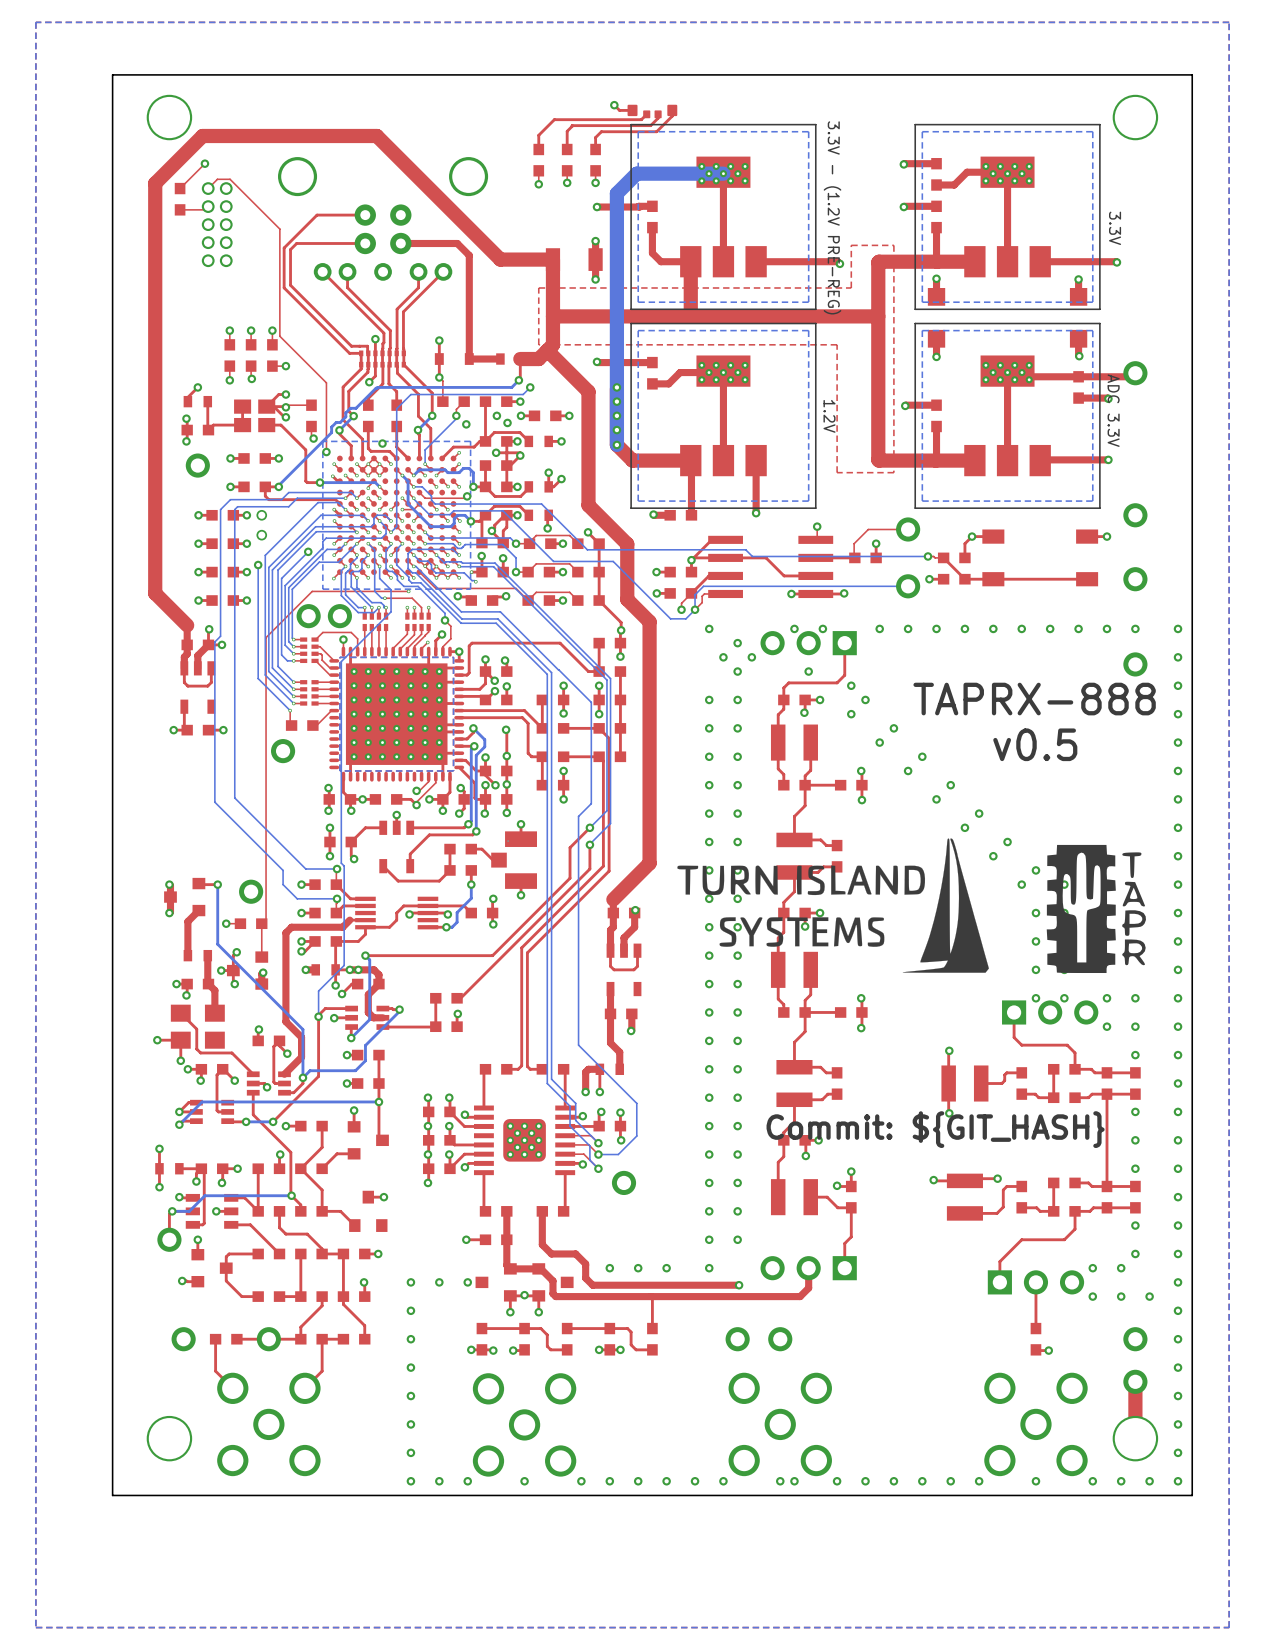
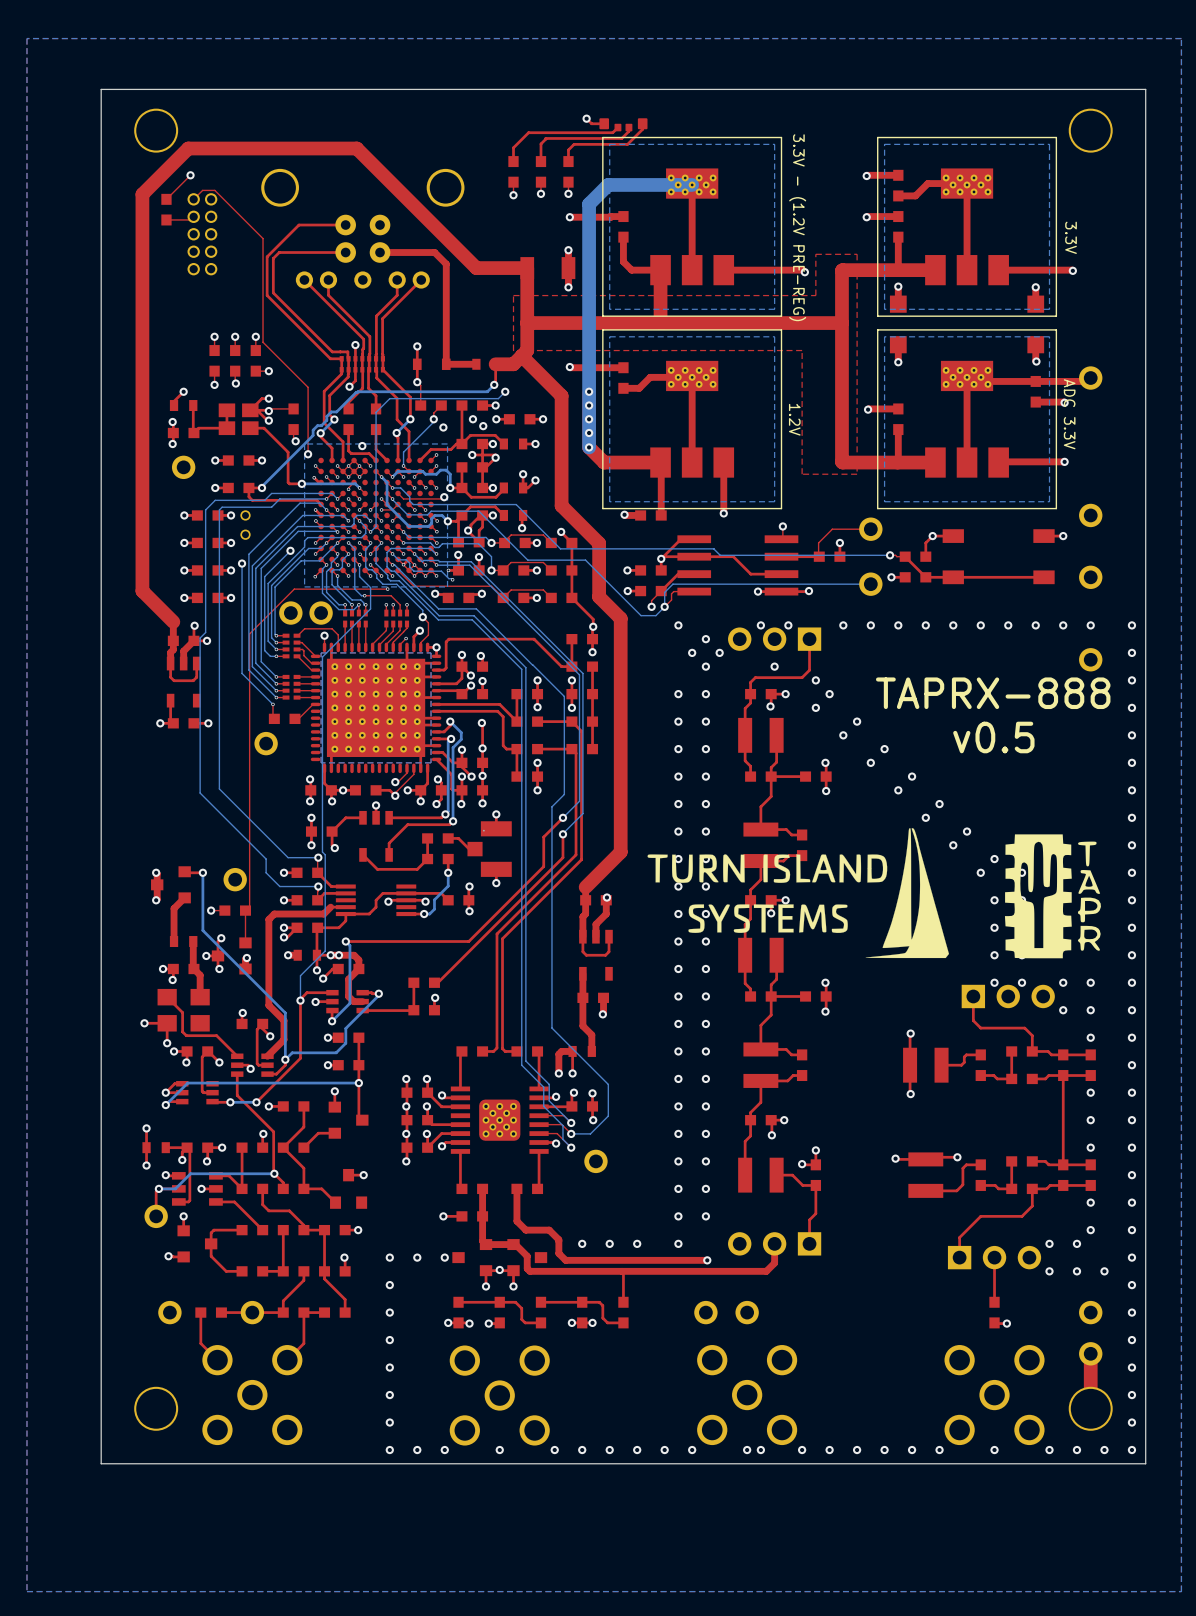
text: Commit: ${GIT_HASH} (935, 1129) -> none

